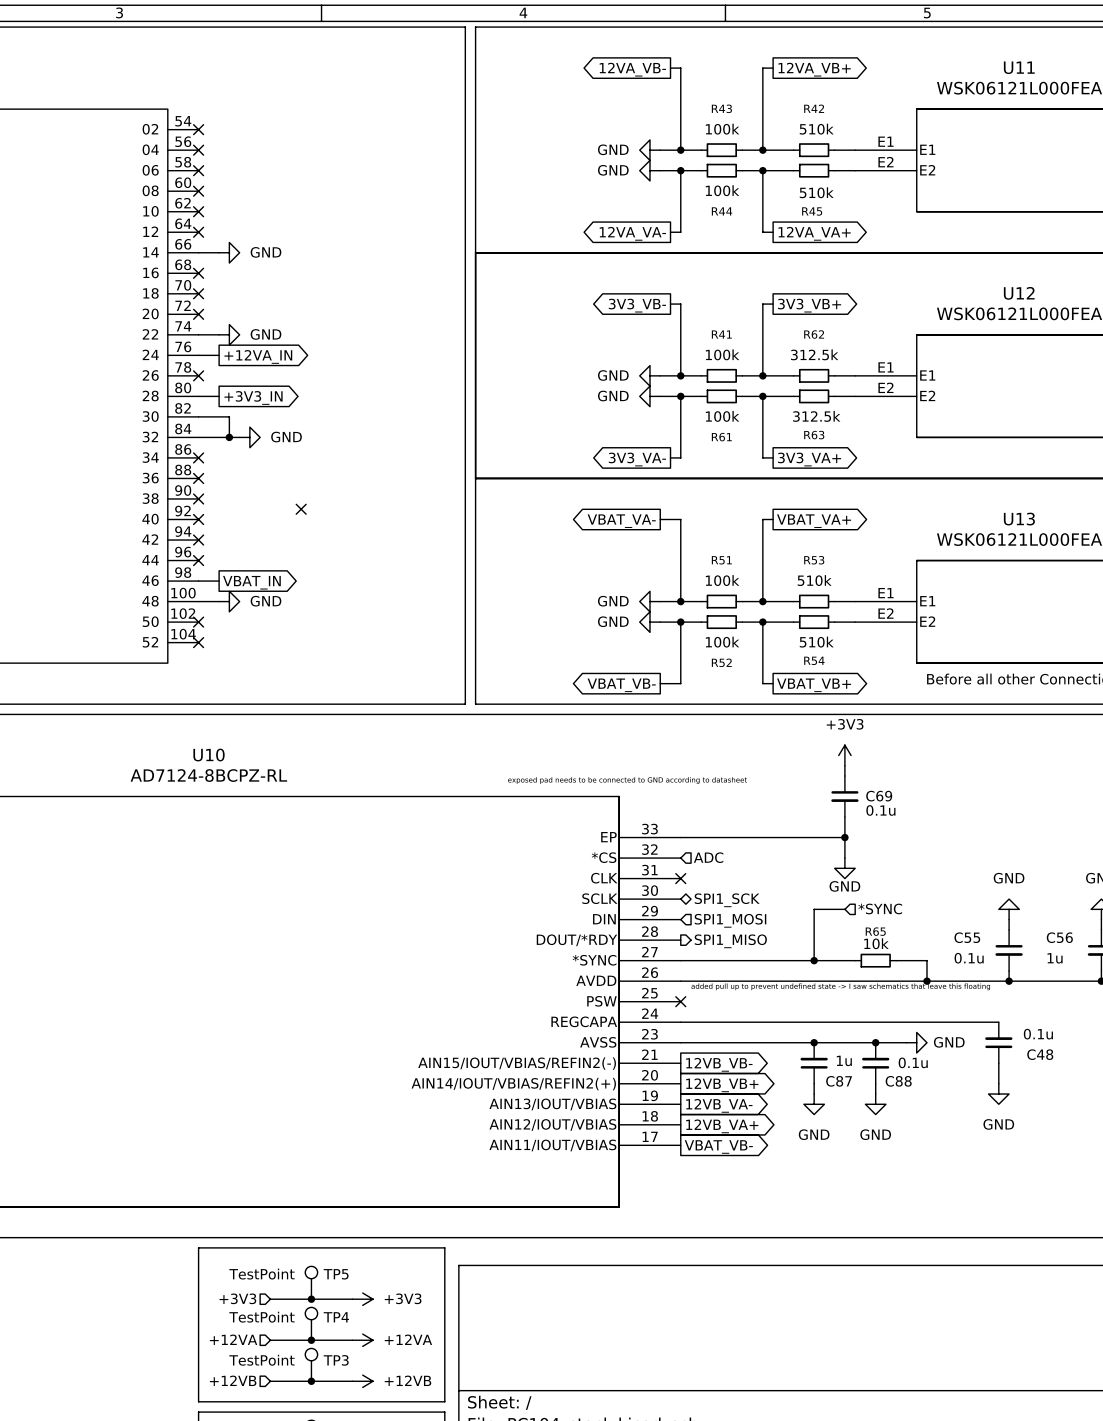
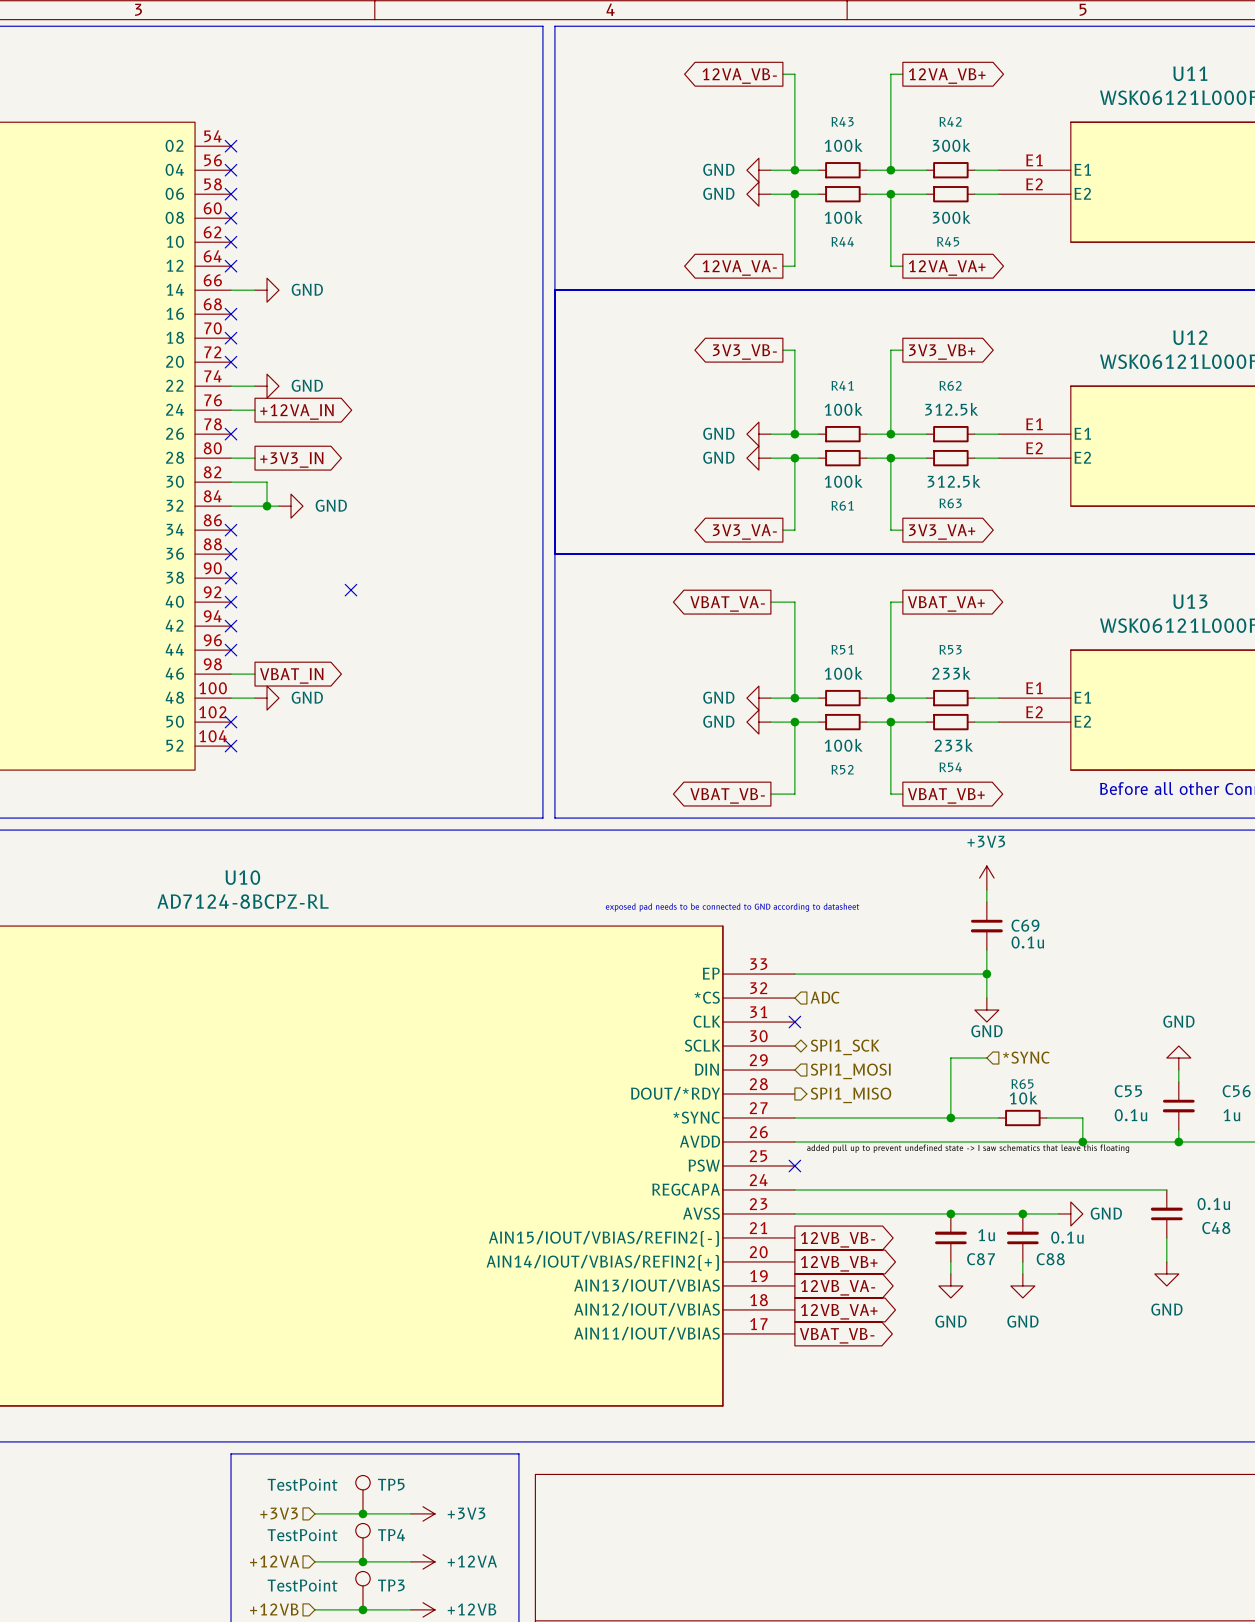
R42 value: 510k (816, 129) -> 300k (951, 145)
R45 value: 510k (816, 192) -> 300k (951, 217)
R53 value: 510k (814, 580) -> 233k (951, 673)
R54 value: 510k (816, 642) -> 233k (953, 745)

